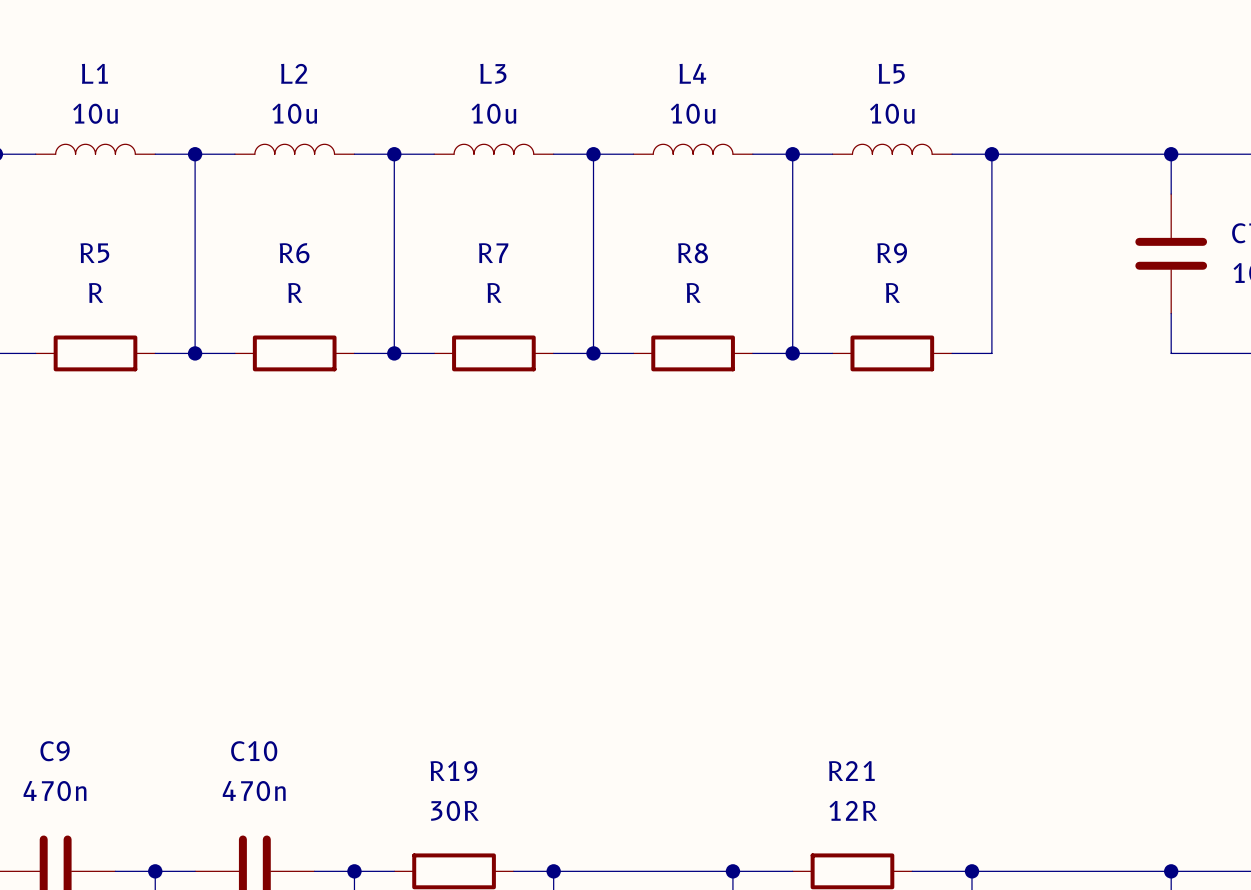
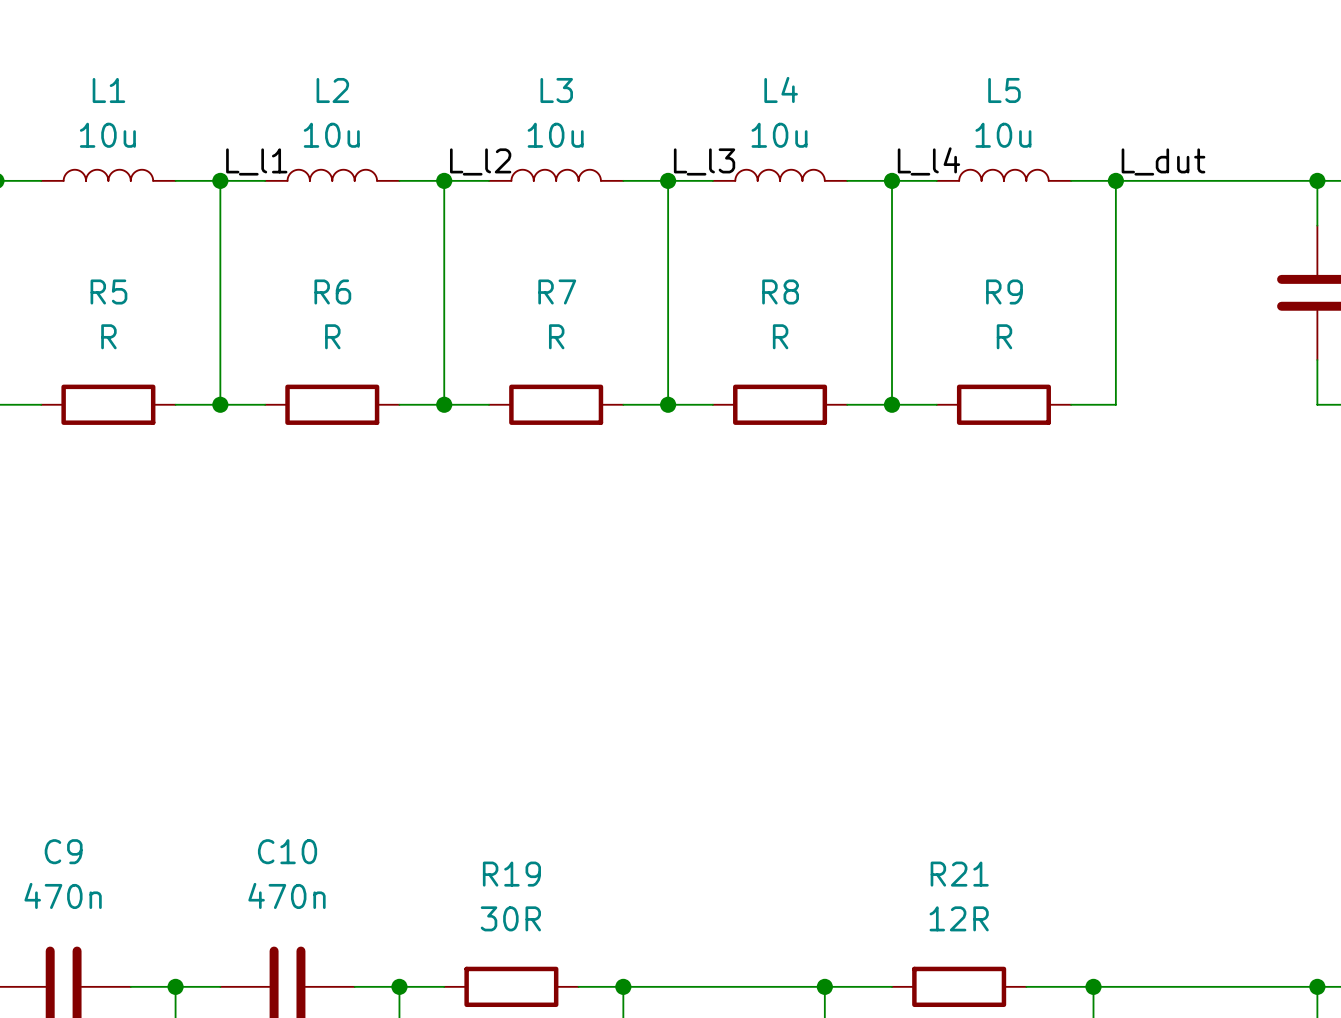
label: none -> L_l1 (256, 161)
label: none -> L_l2 (480, 161)
label: none -> L_l3 (704, 161)
label: none -> L_l4 (928, 161)
label: none -> L_dut (1163, 161)

